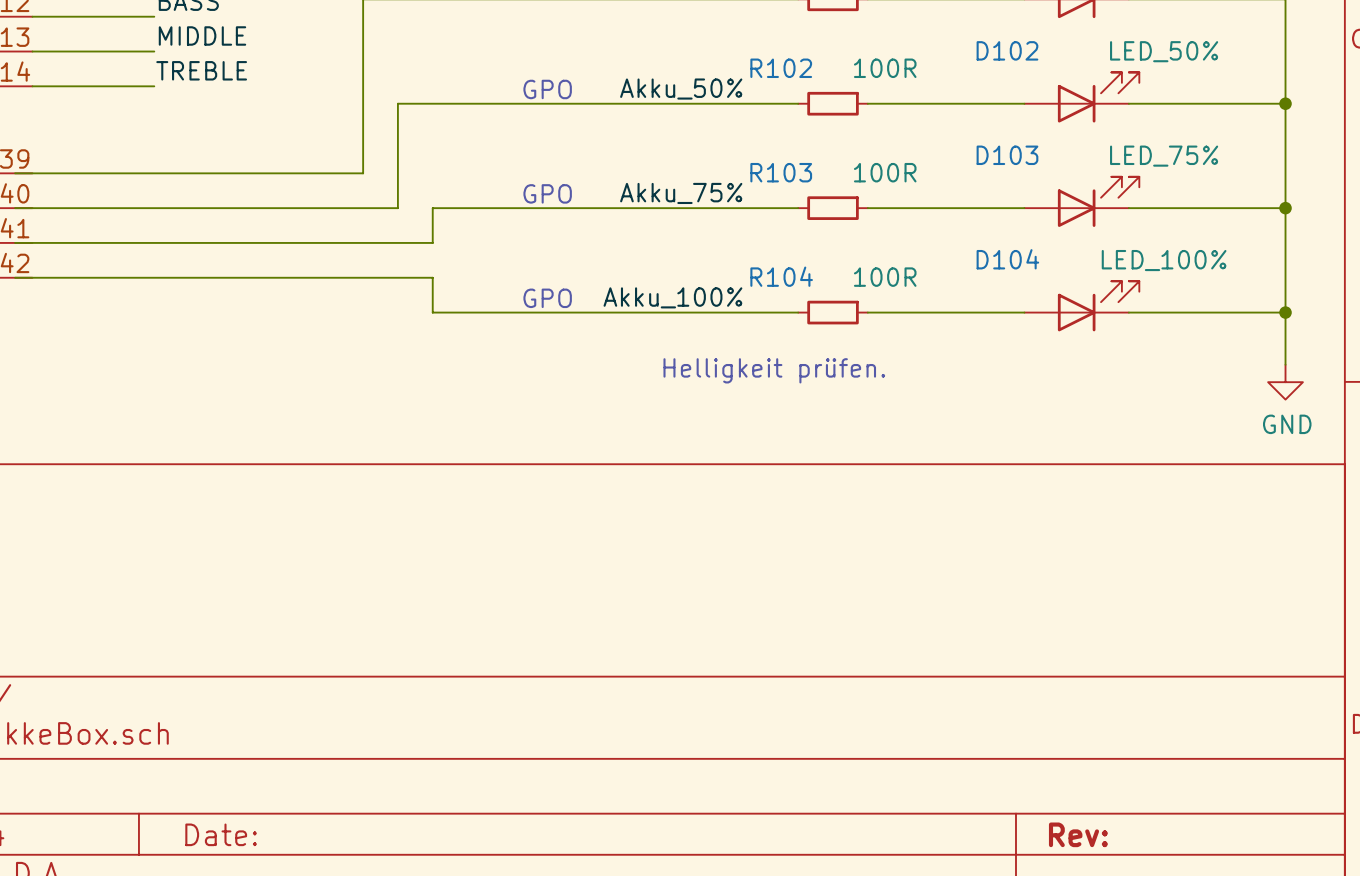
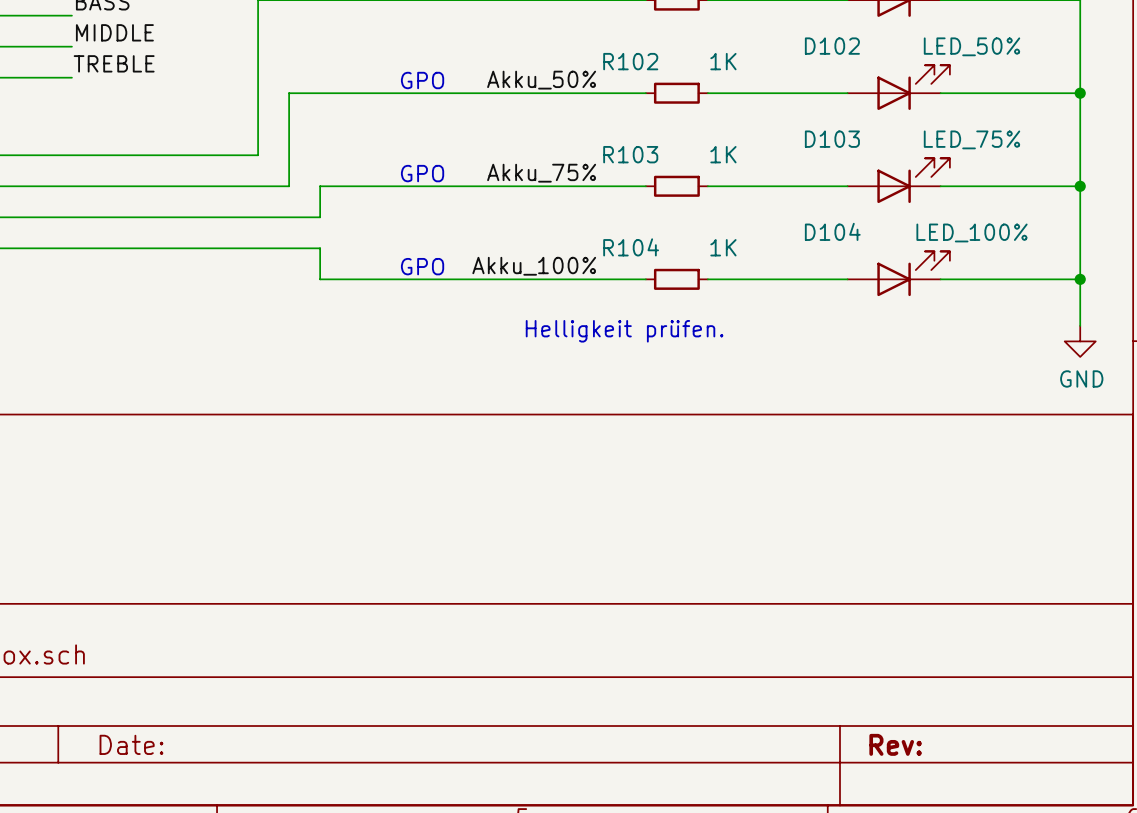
R102 value: 100R (885, 68) -> 1K (723, 61)
R103 value: 100R (885, 172) -> 1K (723, 154)
R104 value: 100R (885, 277) -> 1K (723, 247)

